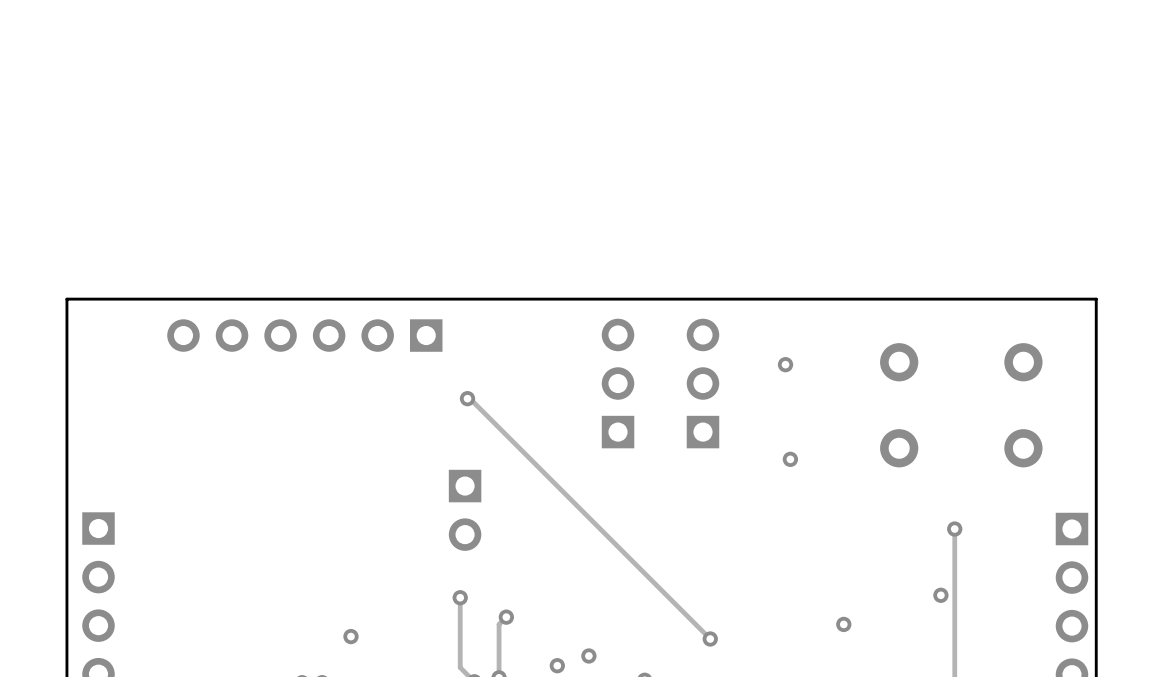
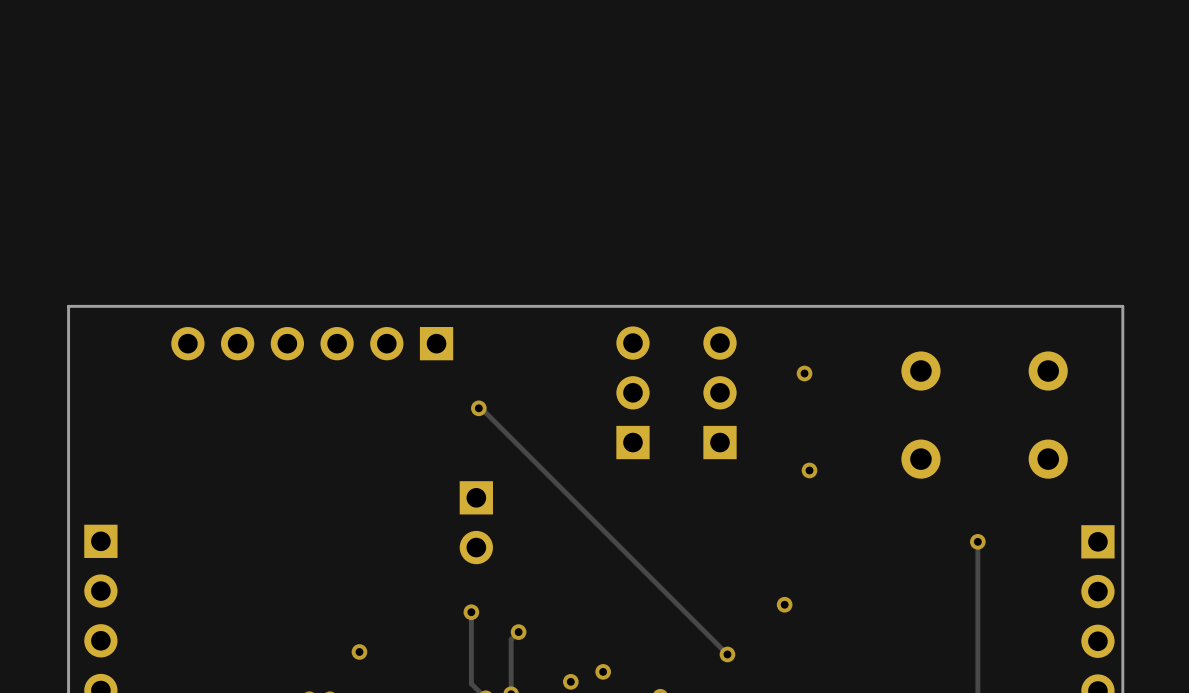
via: none -> (784, 604)
via: (940, 595) -> none
via: (843, 624) -> none

